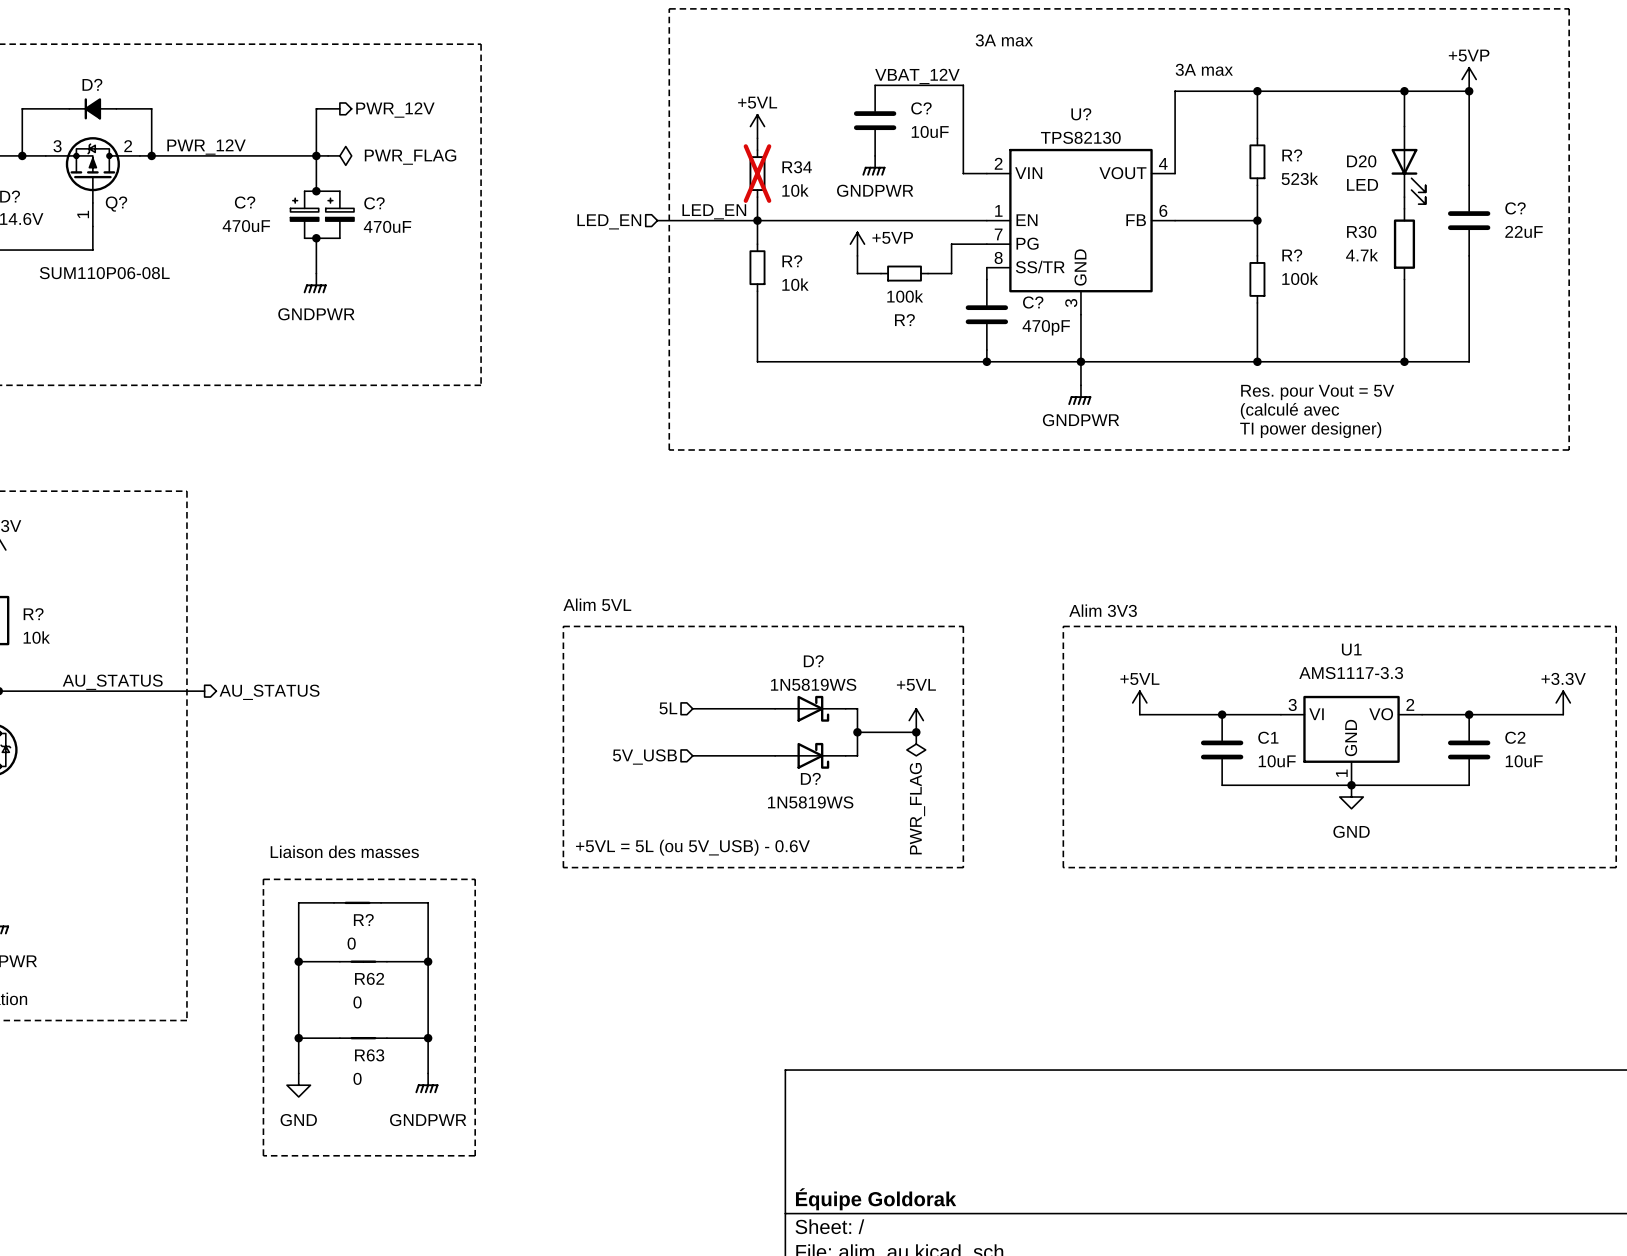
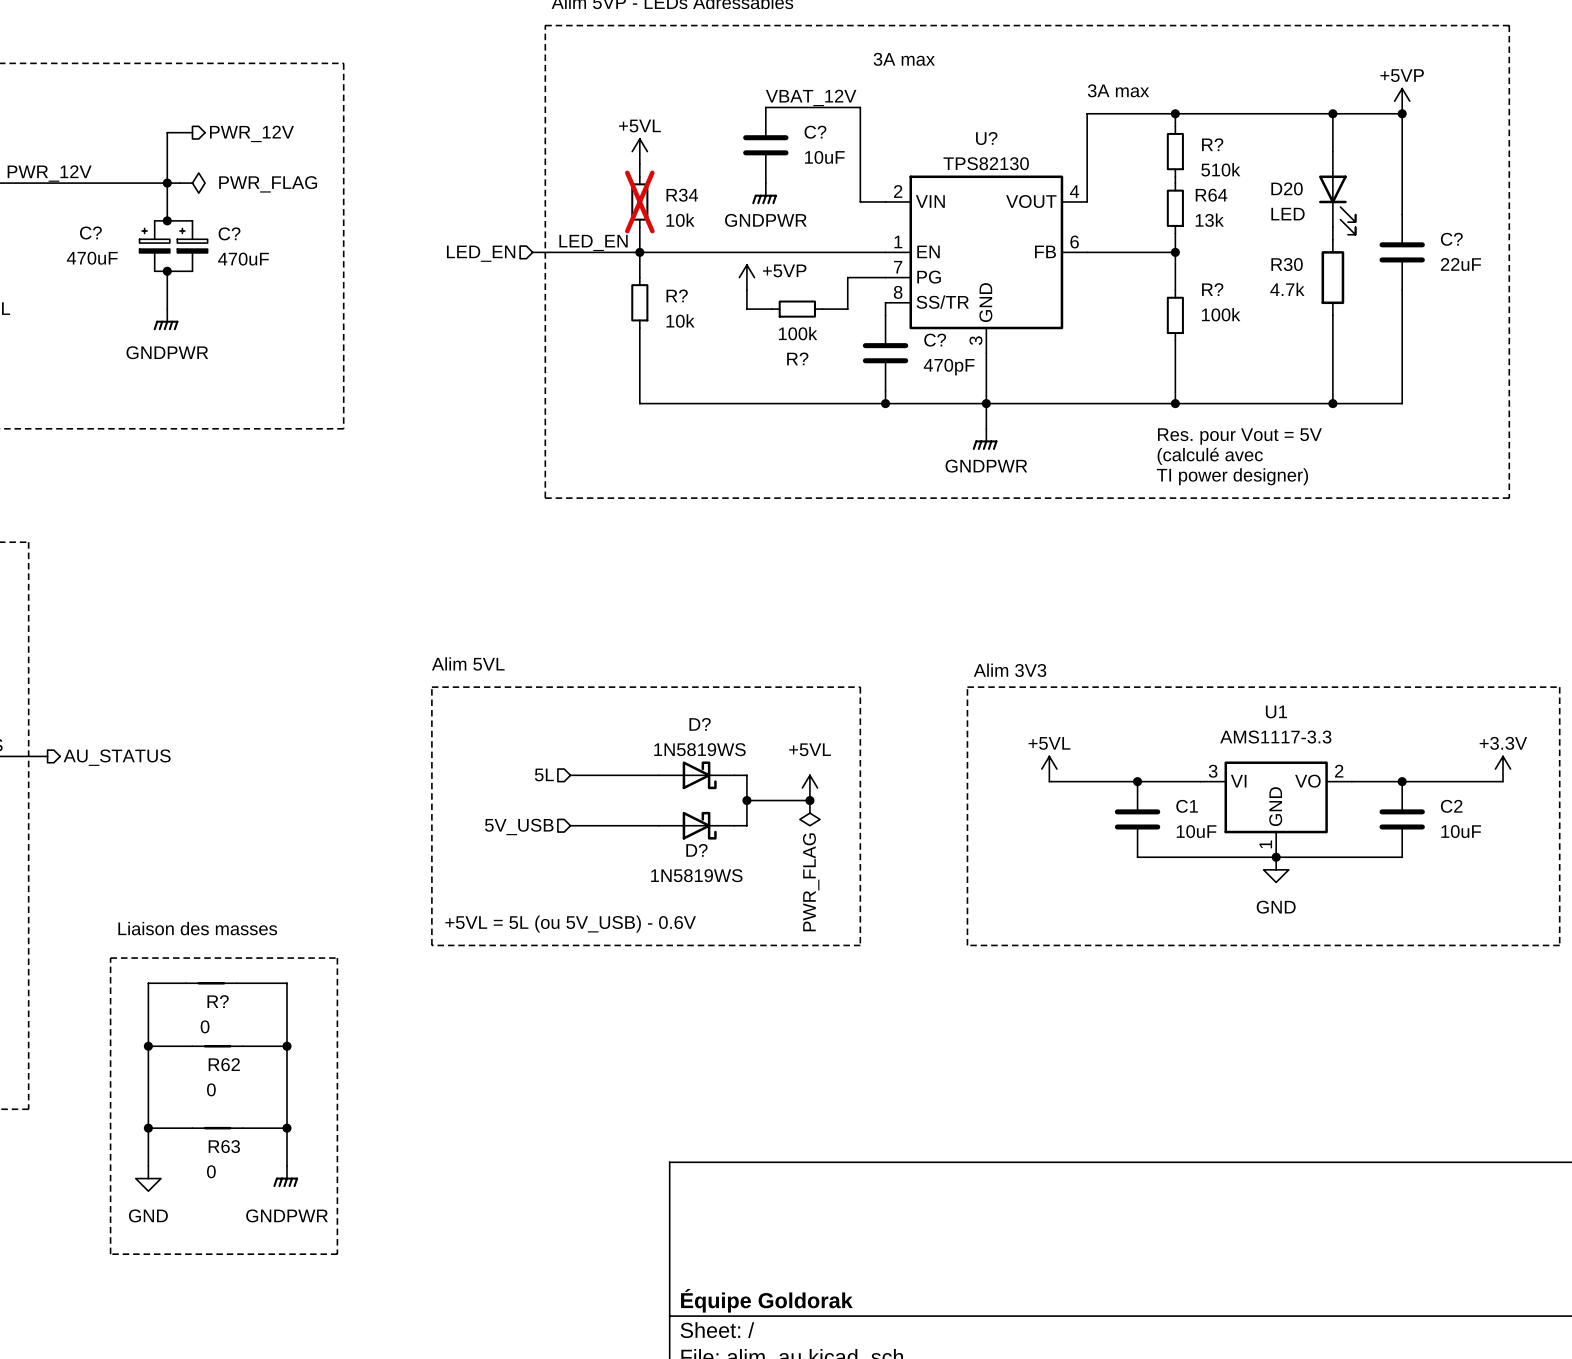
wire: (1257, 102) (1257, 138) -> none
R?: none -> 510k (1175, 151)
wire: none -> (1175, 176) (1175, 183)
R?: 523k (1257, 161) -> none
R64: none -> 13k (1175, 208)
wire: (1257, 185) (1257, 202) -> none

